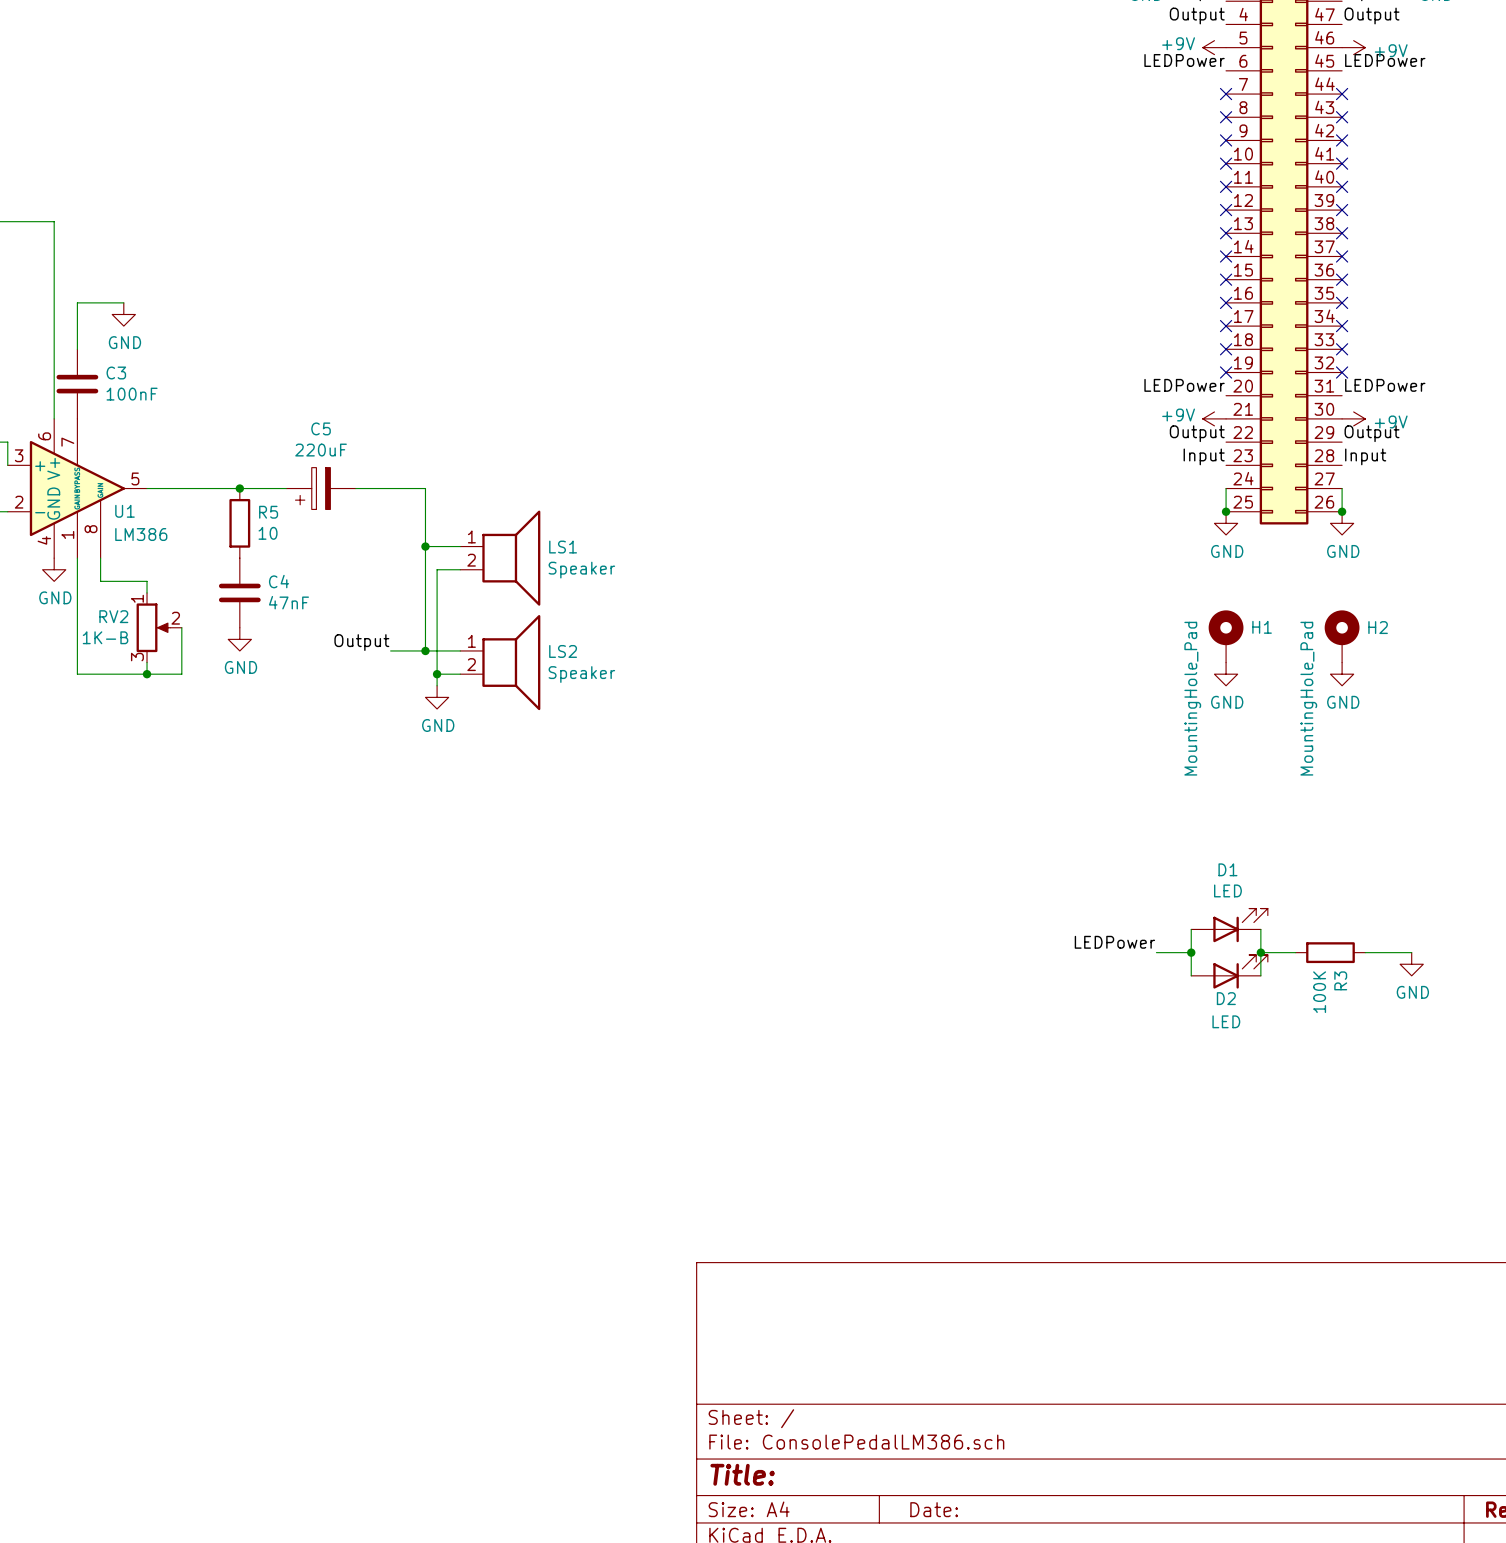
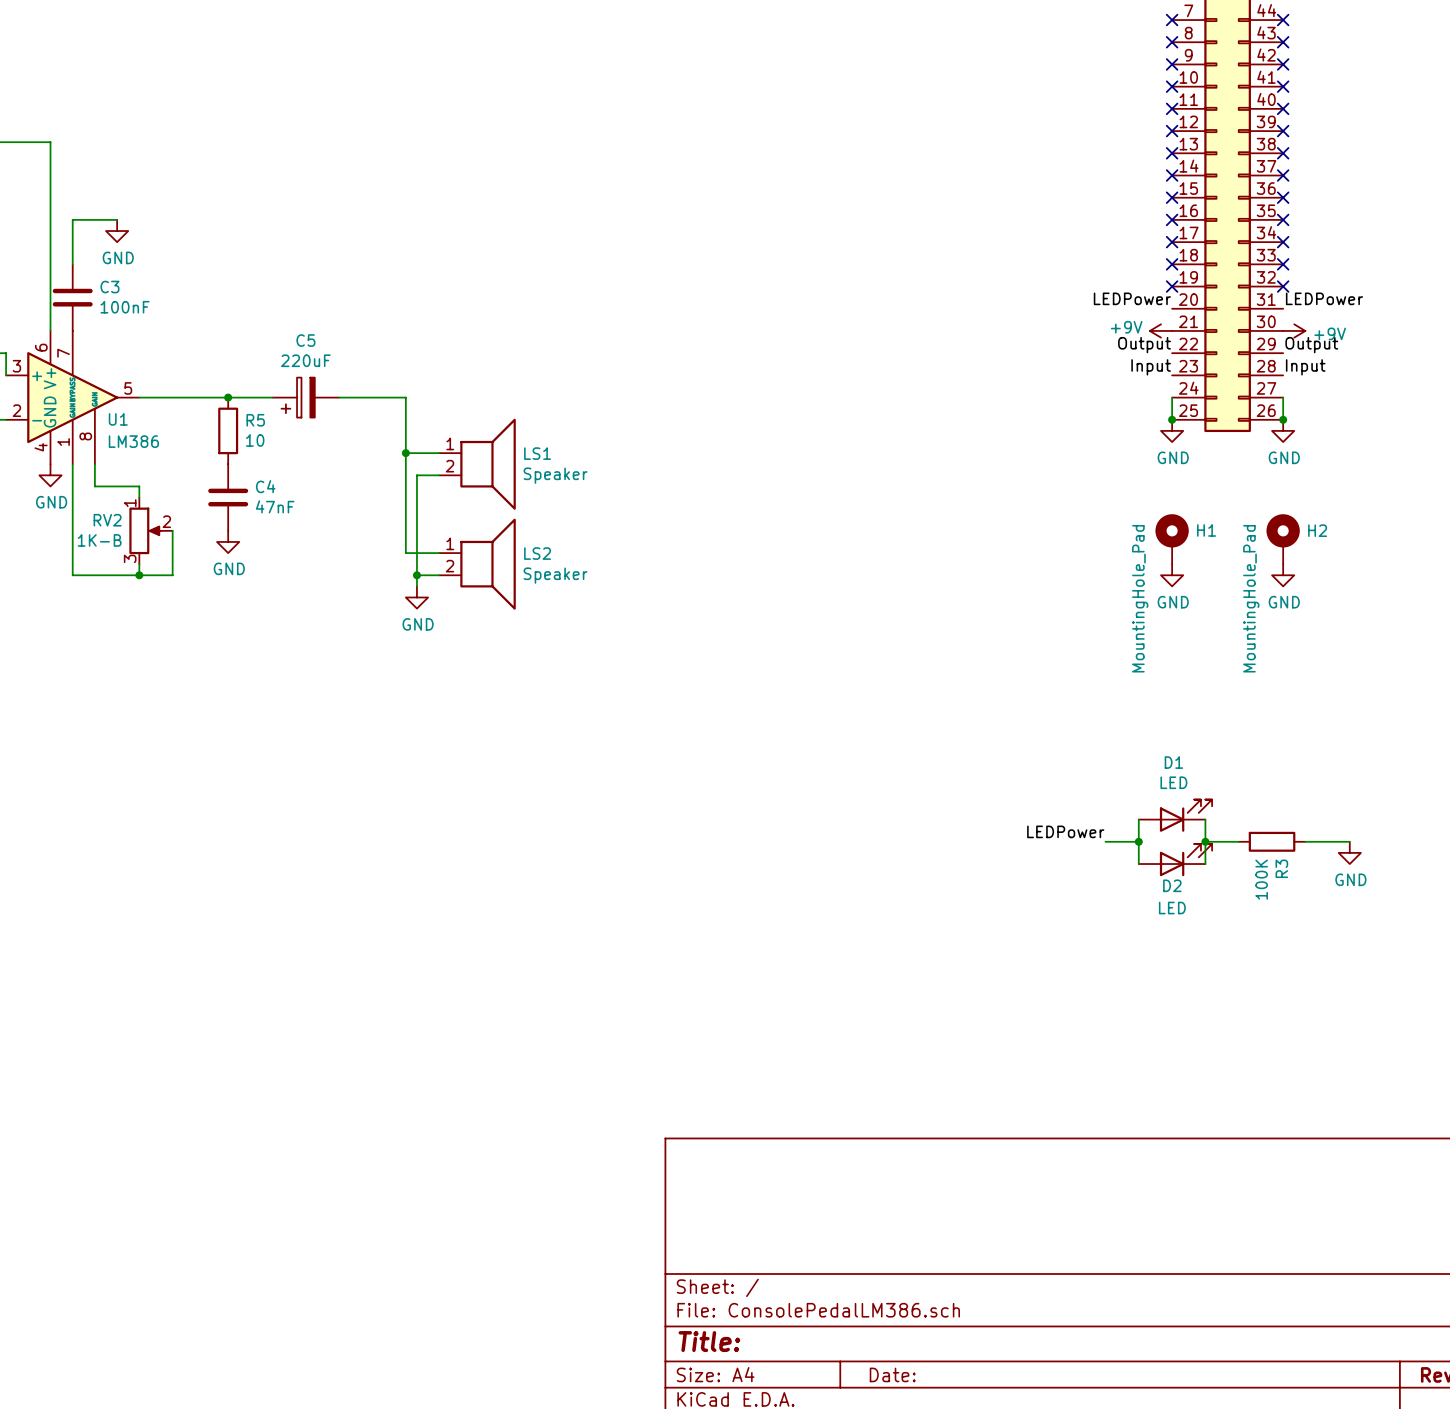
label: Output (361, 642) -> none
wire: (390, 650) (425, 650) -> none
junction: (425, 650) -> none

